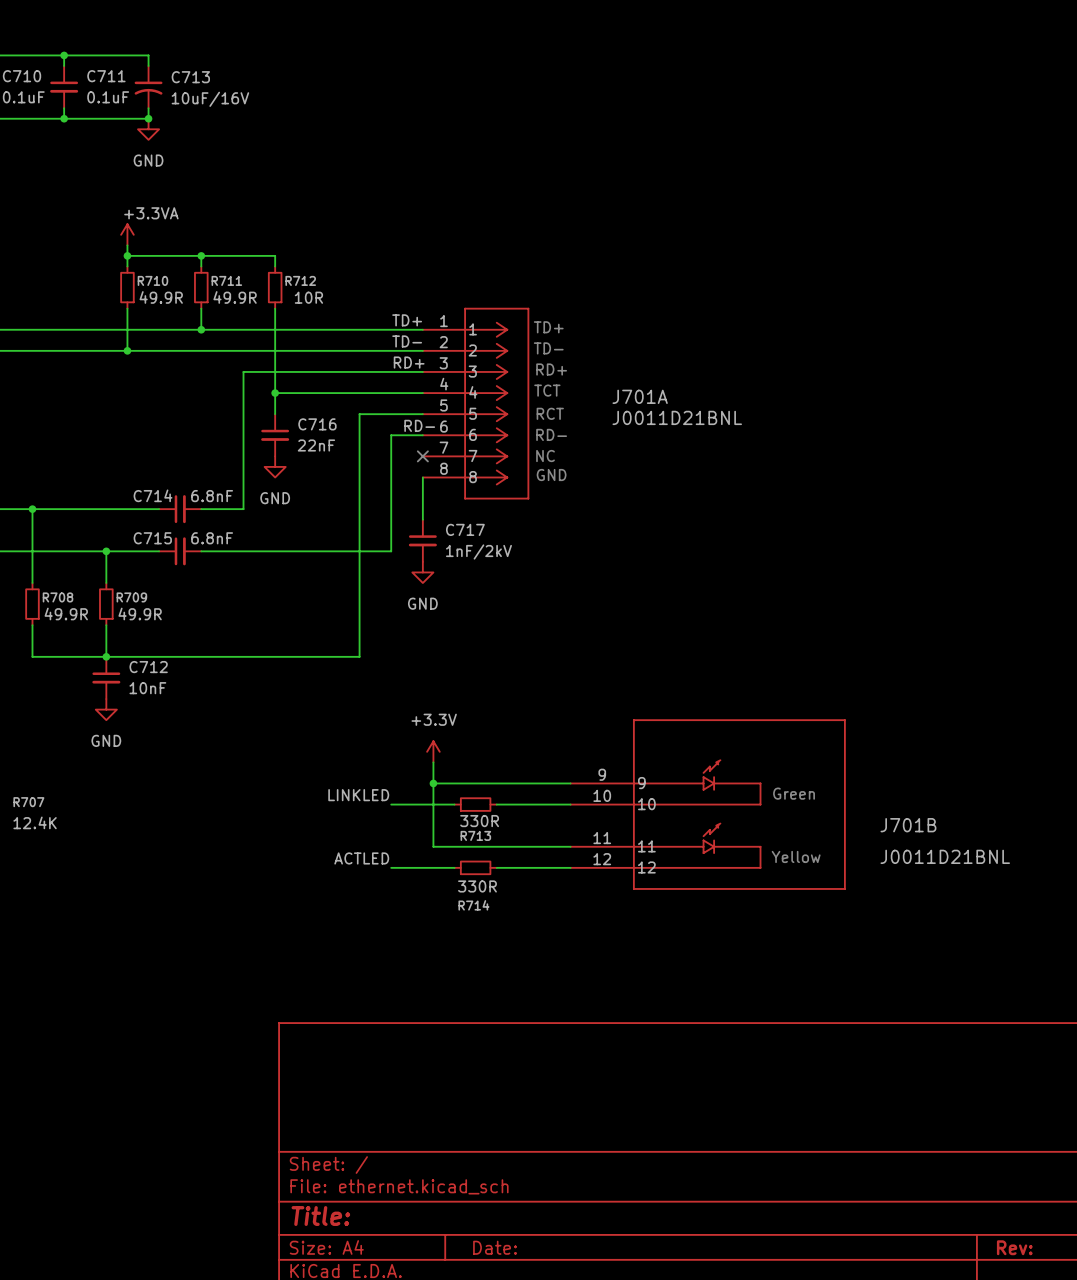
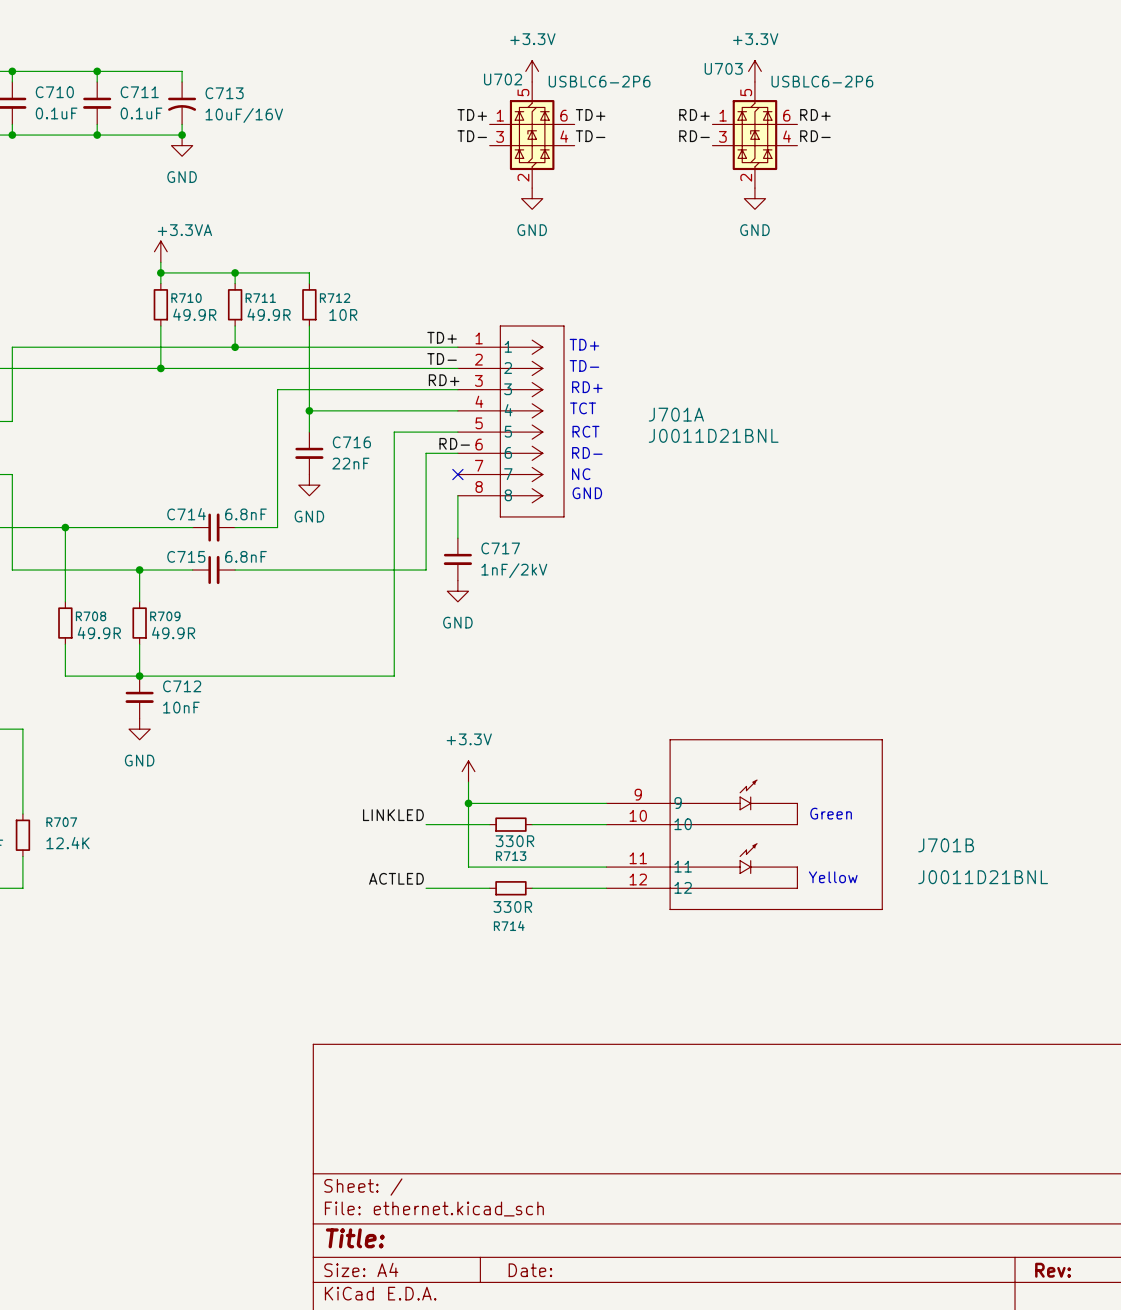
power symbol: none -> +3.3V (532, 71)
power symbol: none -> +3.3V (754, 71)
label: none -> TD+ (472, 114)
label: none -> TD+ (590, 114)
label: none -> RD+ (694, 114)
label: none -> RD+ (815, 114)
U702: none -> USBLC6-2P6 (532, 135)
U703: none -> USBLC6-2P6 (754, 135)
label: none -> TD- (472, 136)
label: none -> TD- (590, 136)
label: none -> RD- (694, 136)
label: none -> RD- (815, 136)
power symbol: none -> GND (532, 198)
power symbol: none -> GND (754, 198)

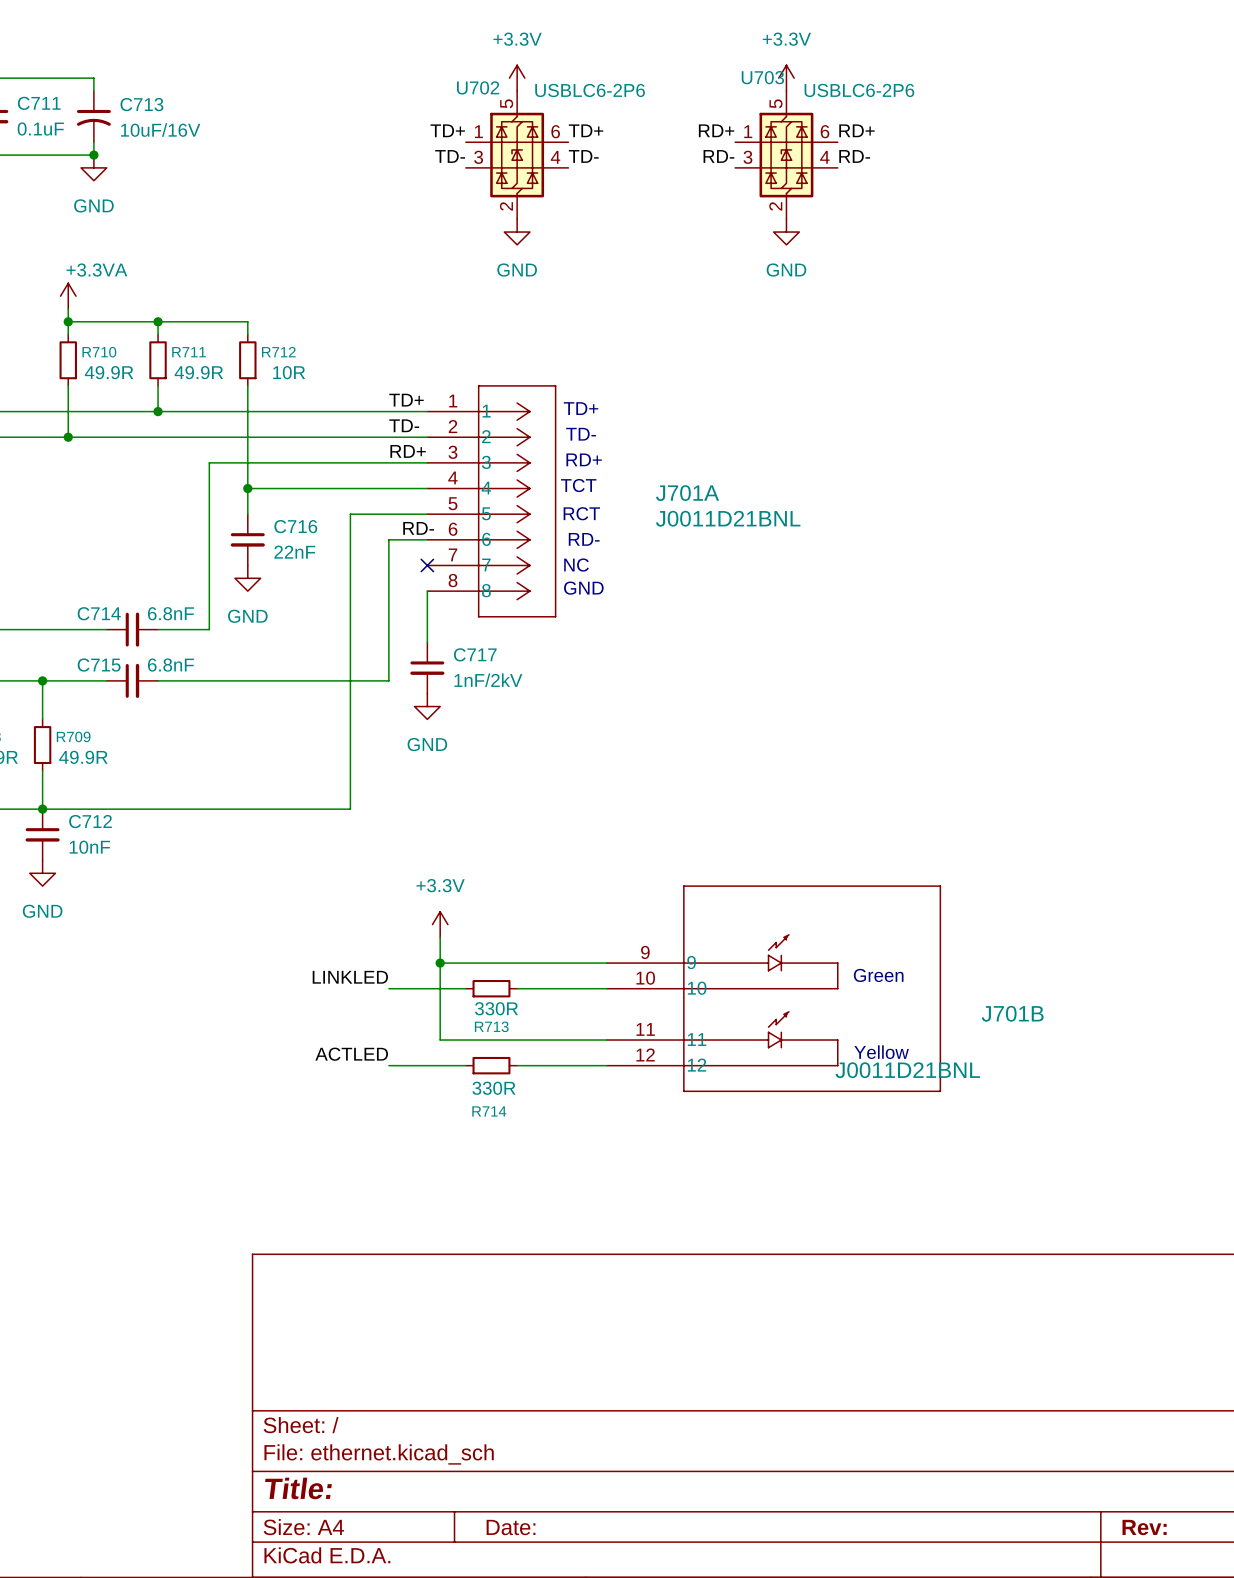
U703 name position: U703 (723, 68) -> U703 (762, 77)
J701B value position: J0011D21BNL (983, 877) -> J0011D21BNL (907, 1070)

